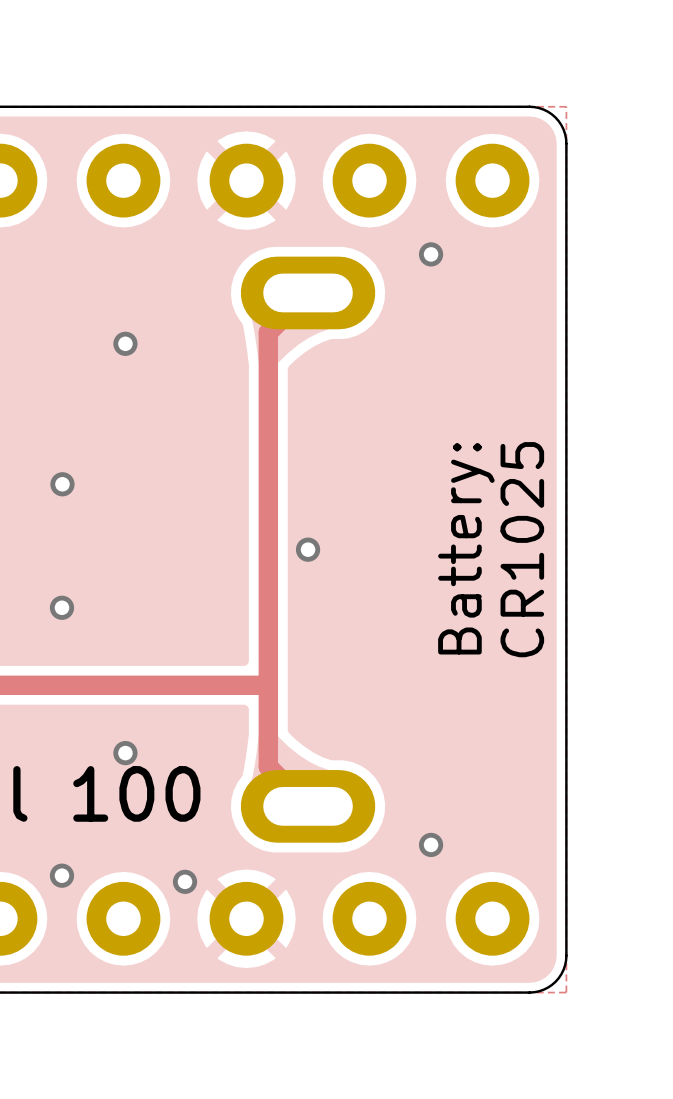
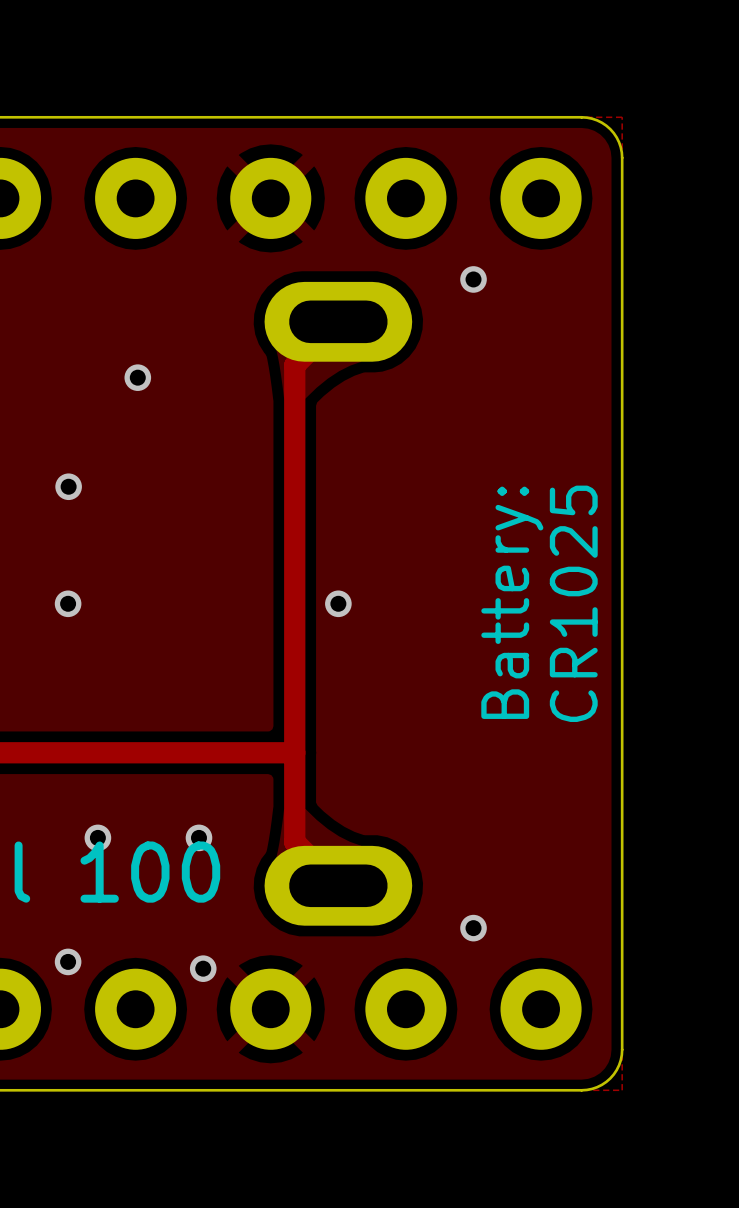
via: none -> (68, 486)
via: (62, 484) -> none
via: none -> (68, 603)
via: (61, 607) -> none
via: (125, 753) -> none
via: none -> (97, 837)
via: none -> (198, 837)

